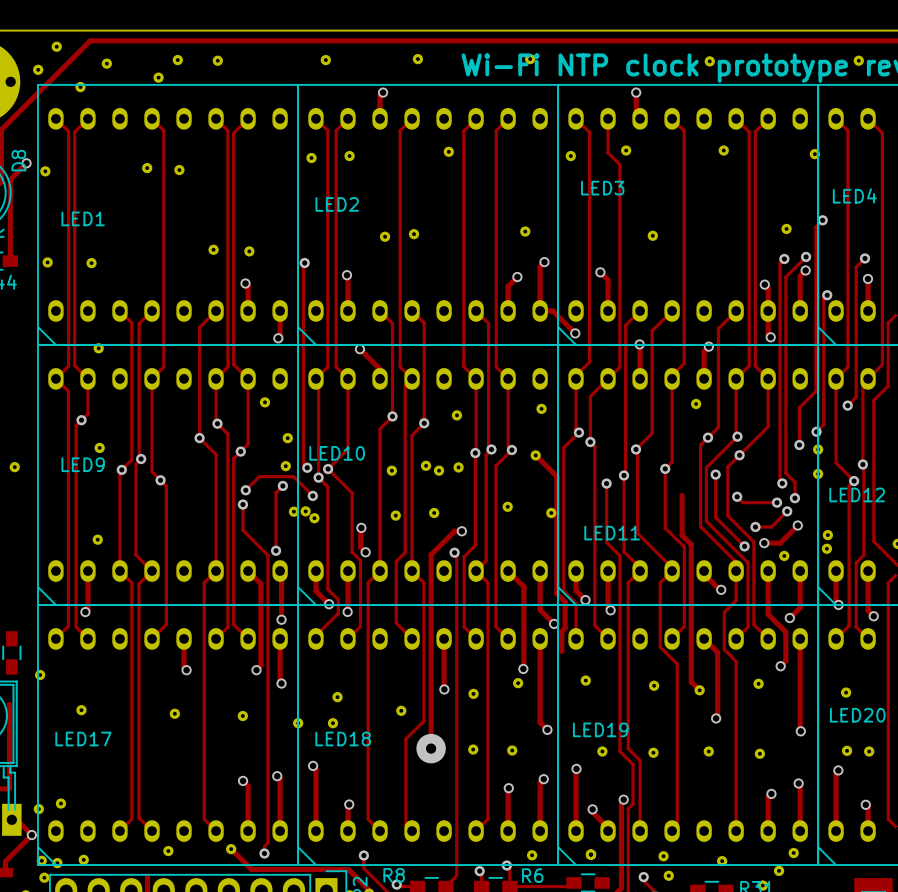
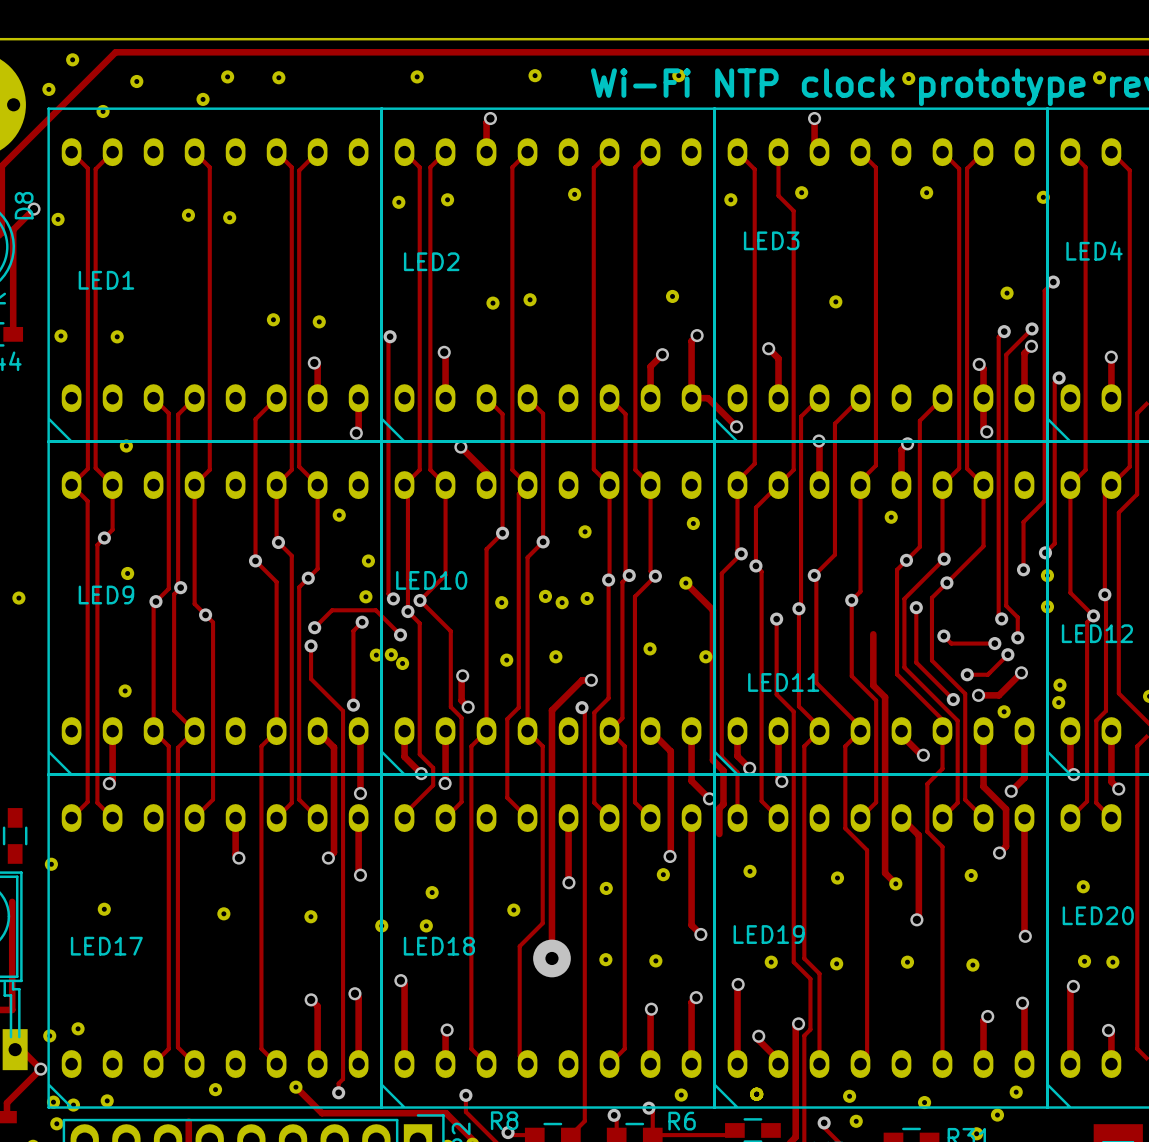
track: (864, 258) (856, 267) (856, 397) (847, 405) -> none
via: (864, 258) -> none
via: (847, 405) -> none

